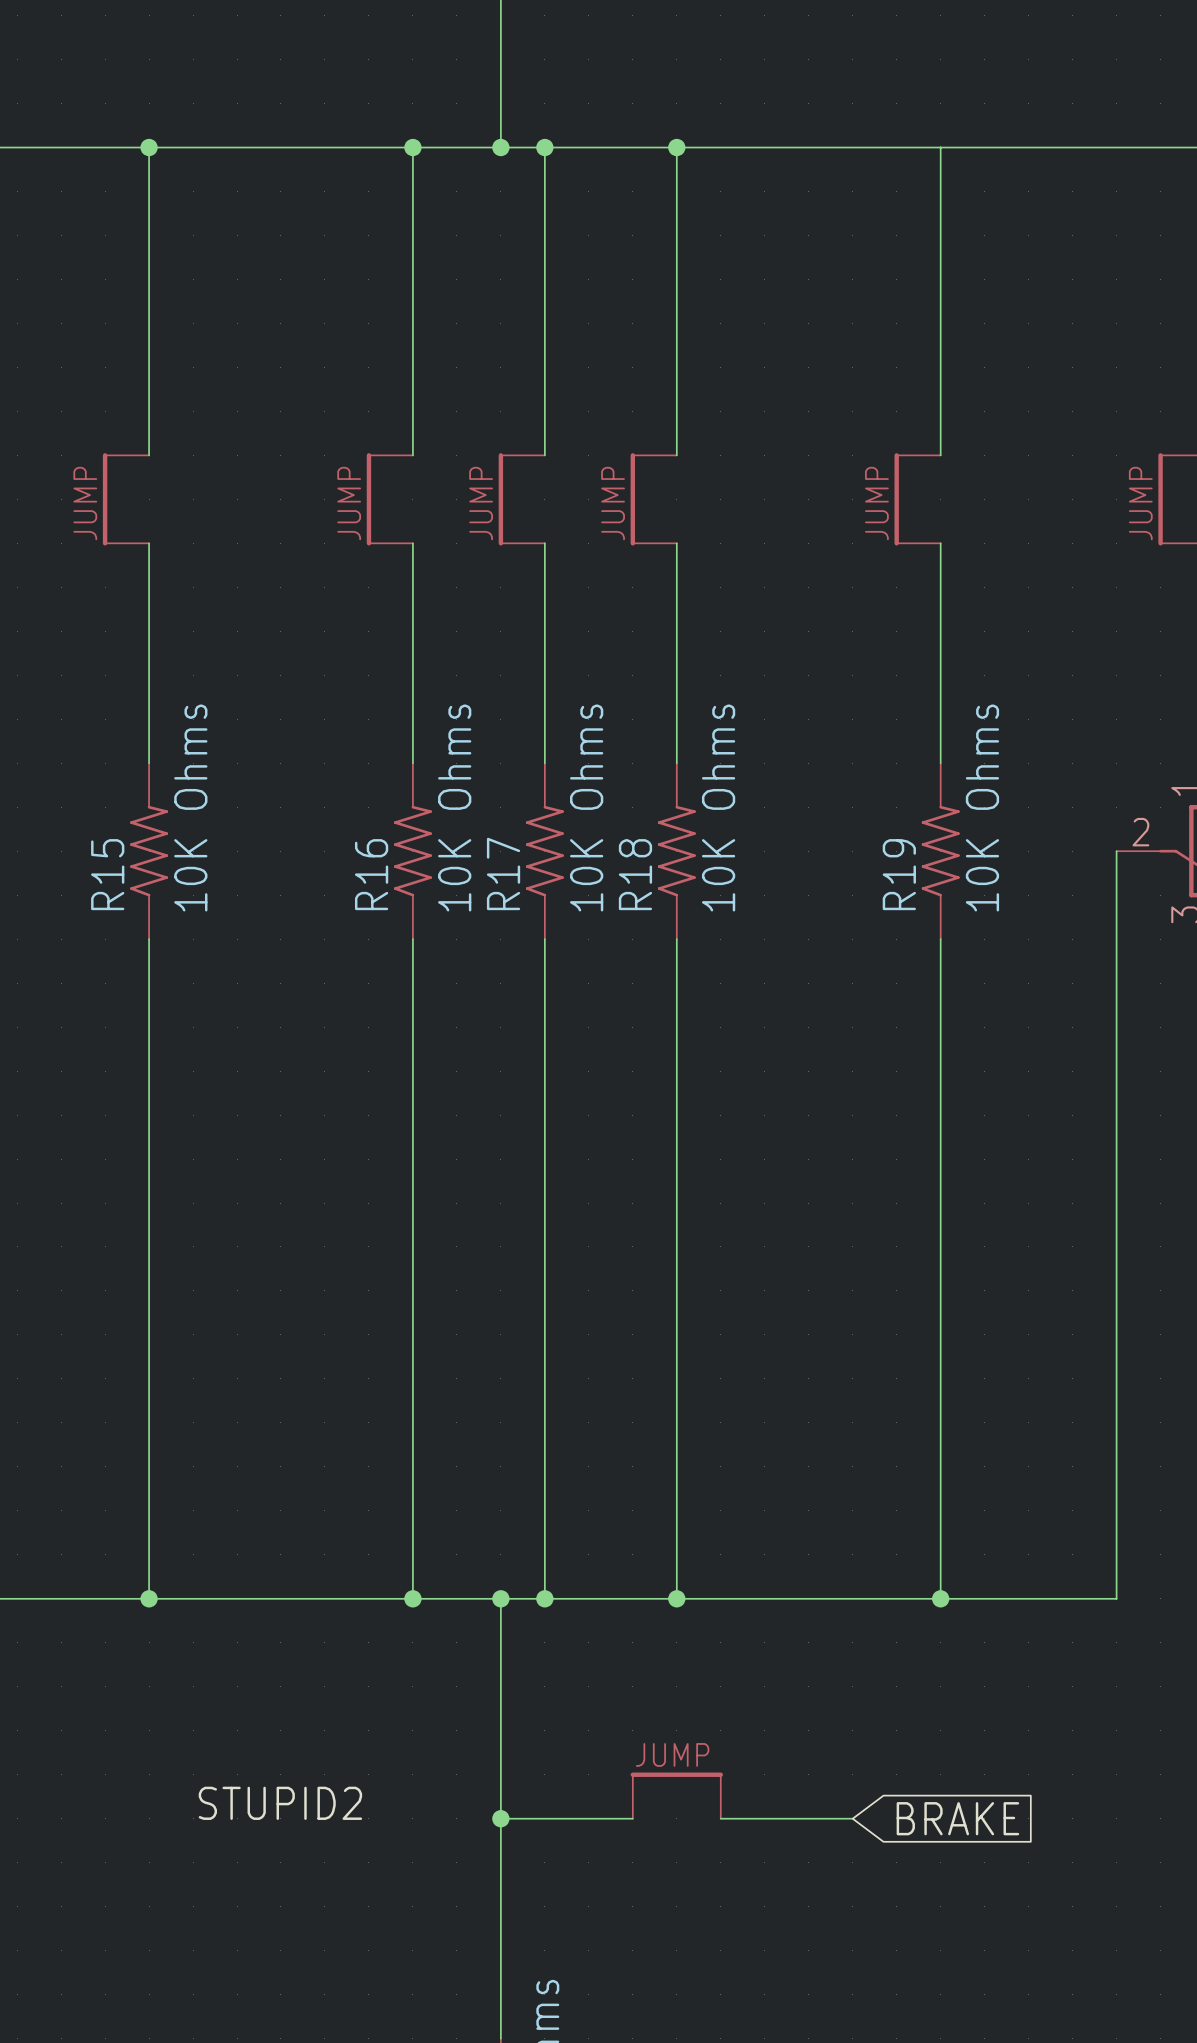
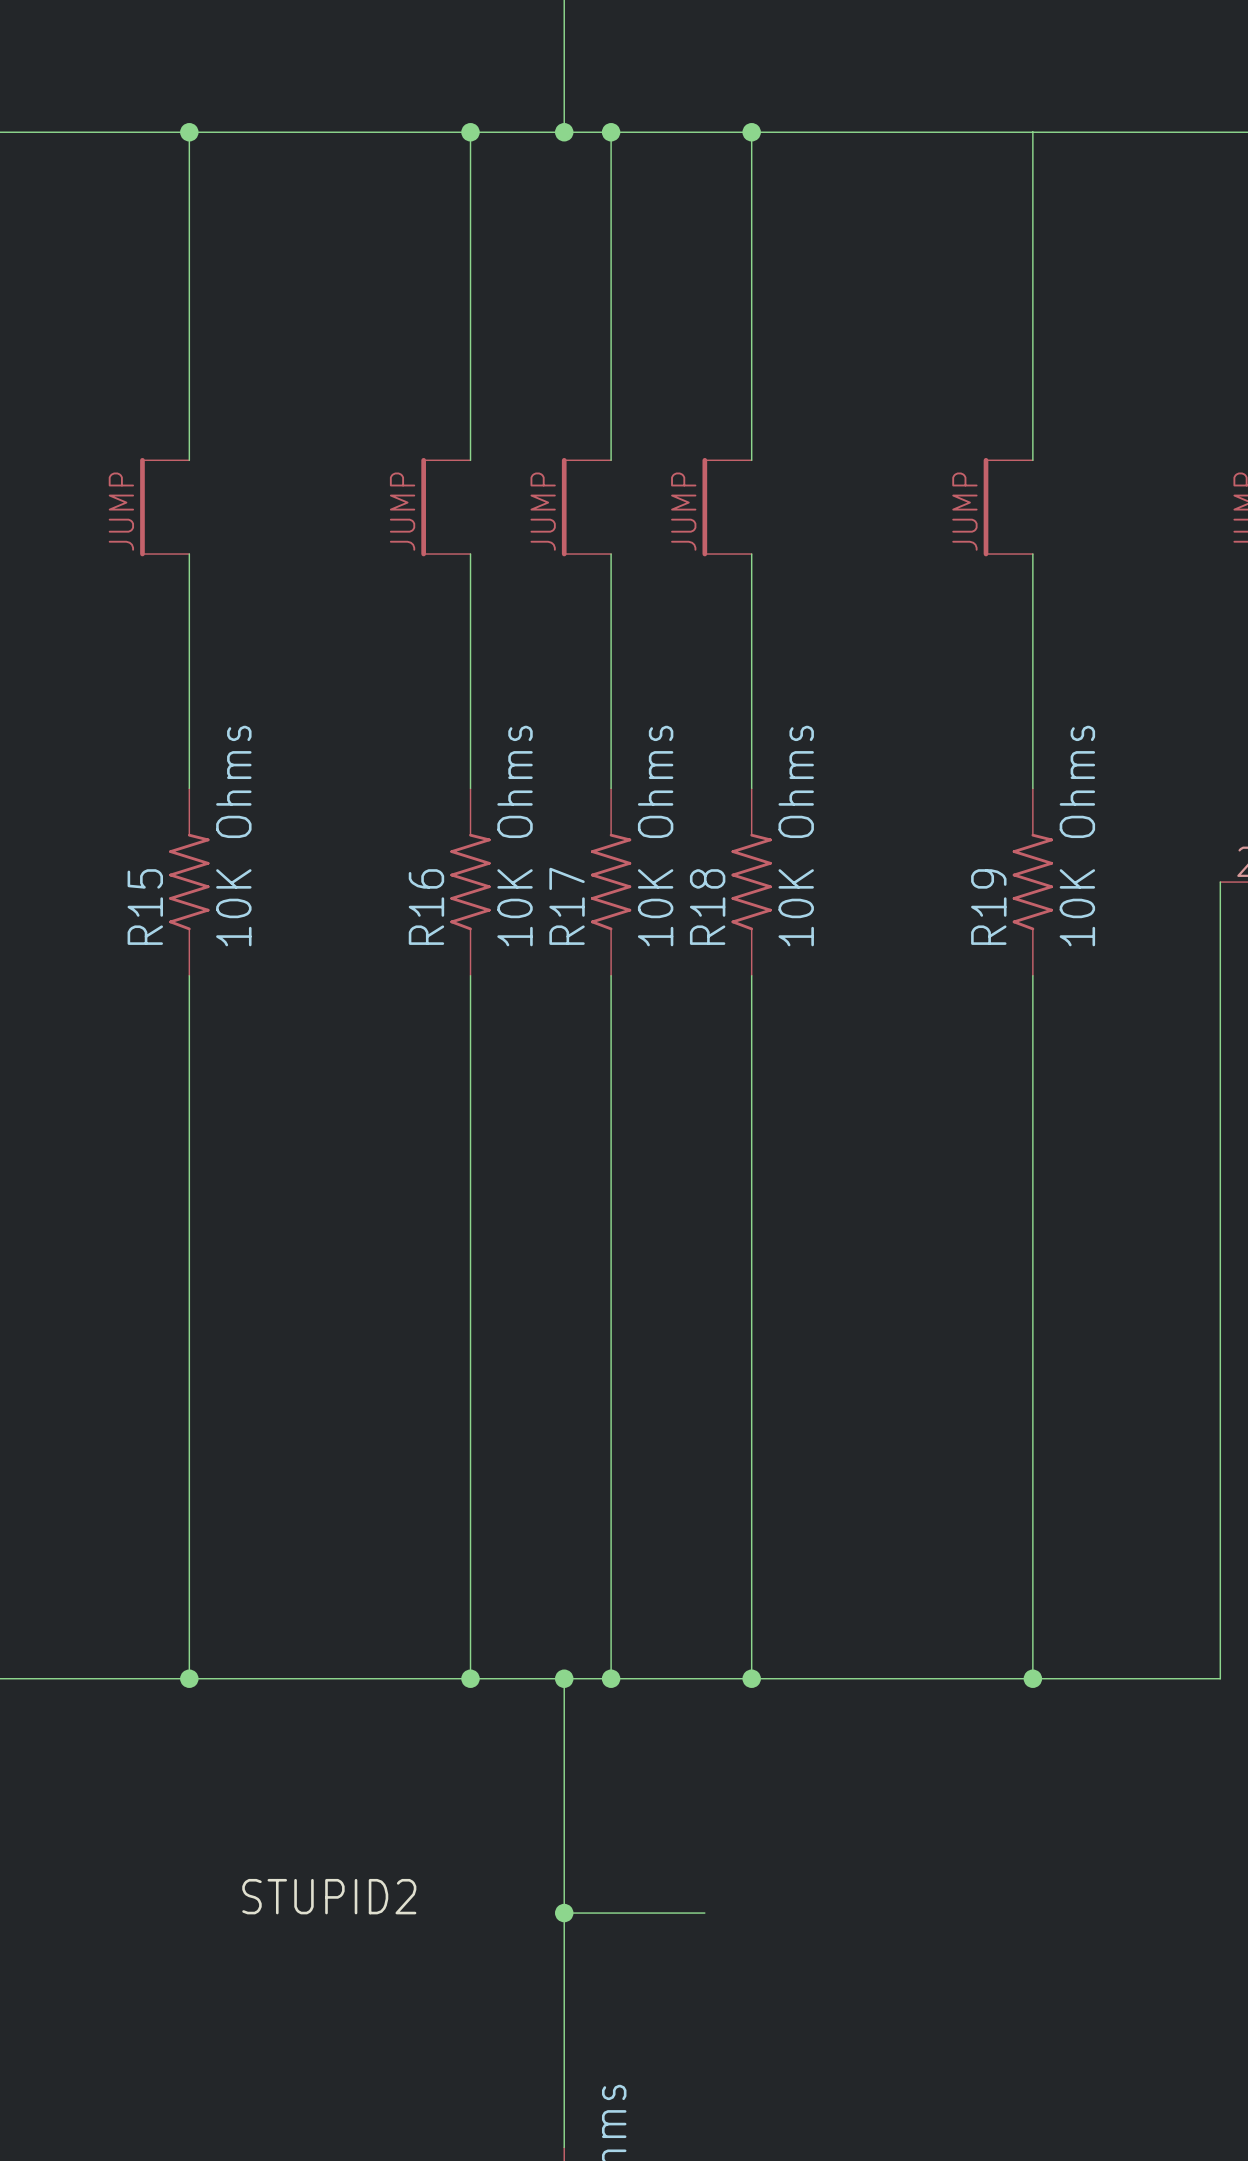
part: (676, 1795) -> none
wire: (720, 1818) (852, 1818) -> none
global label: BRAKE (957, 1818) -> none

